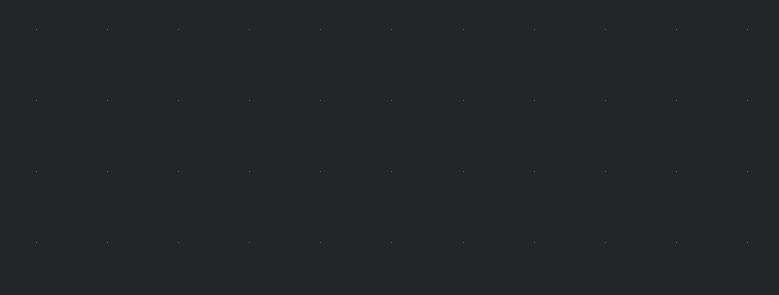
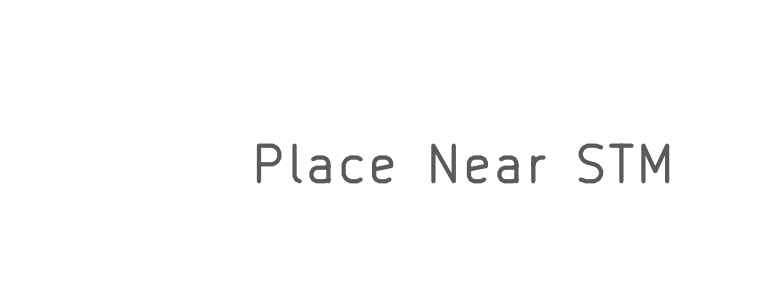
text: none -> Place Near STM (463, 163)

